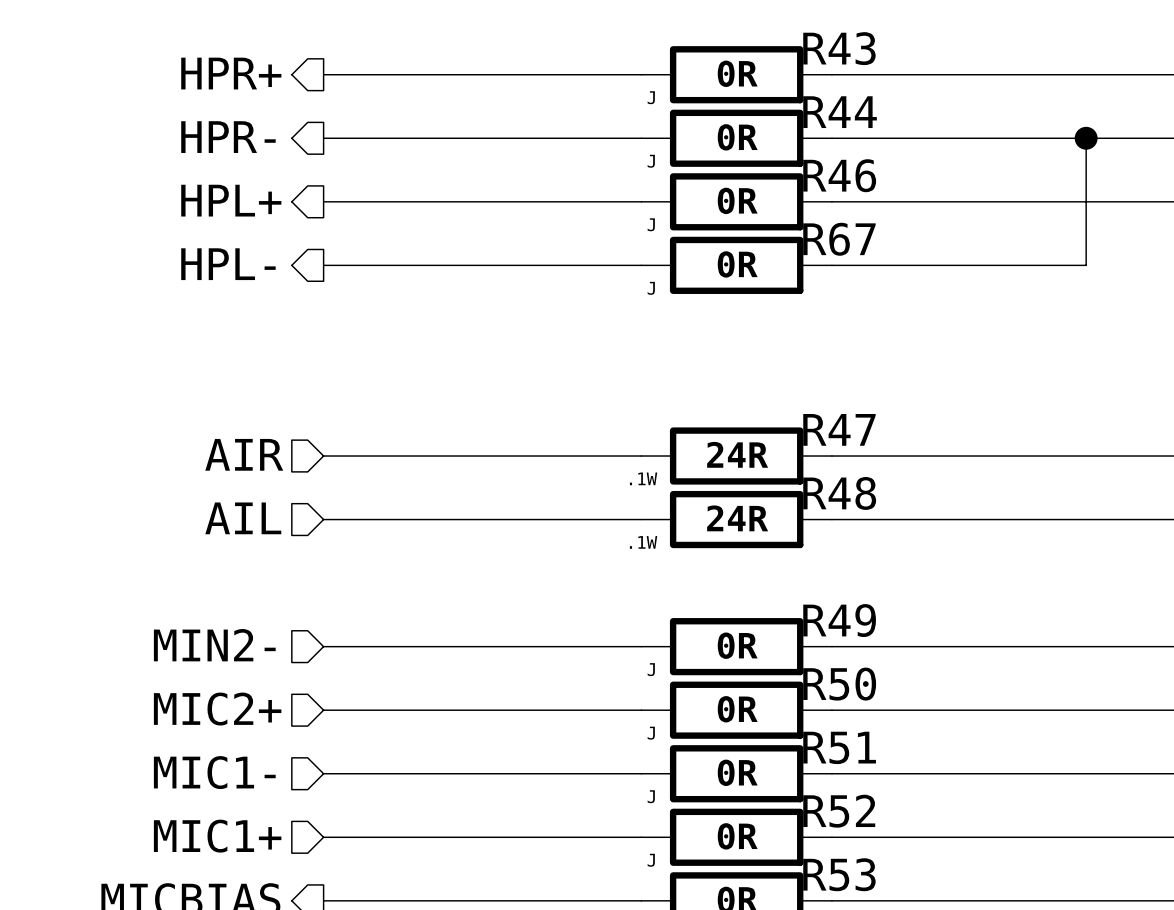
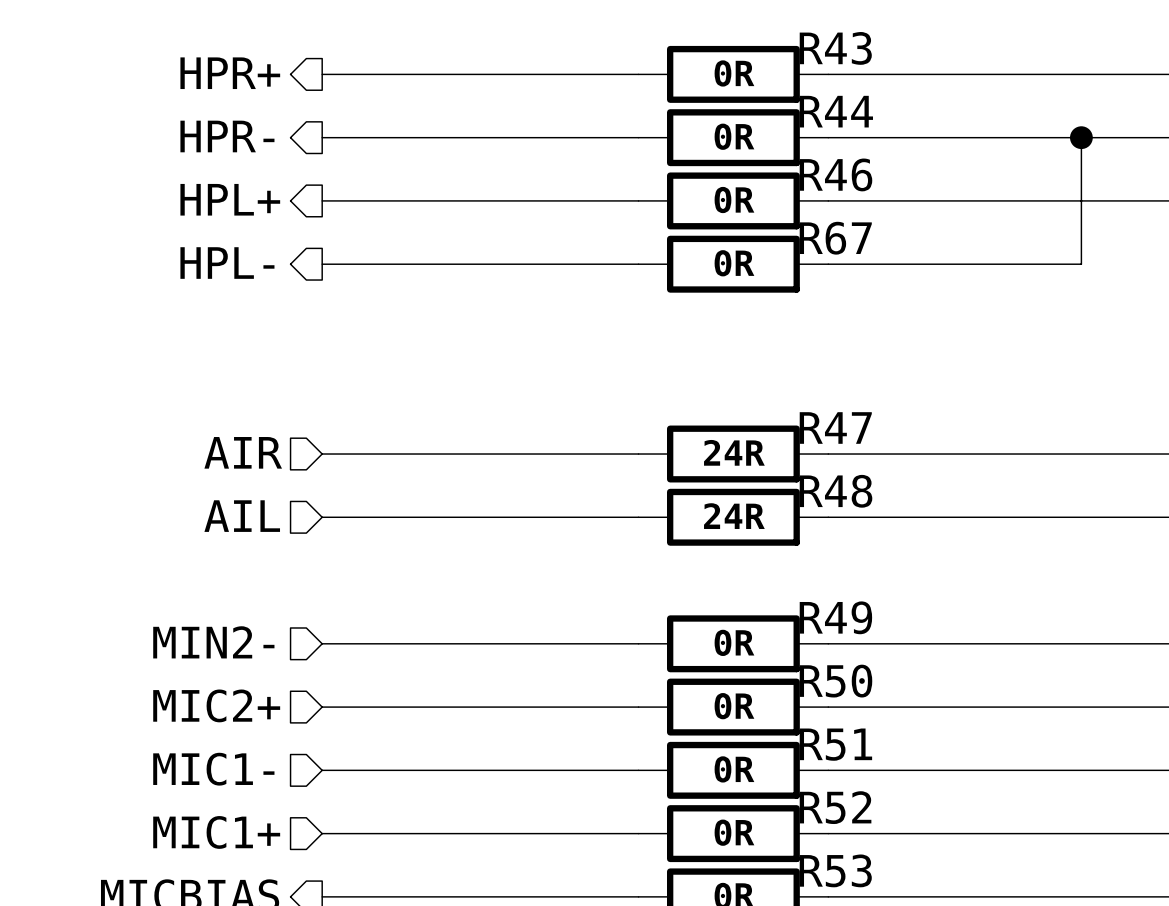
R43 text: J (651, 97) -> none
R44 text: J (651, 161) -> none
R46 text: J (651, 224) -> none
R67 text: J (651, 288) -> none
R47 text: .1W (643, 478) -> none
R48 text: .1W (643, 542) -> none
R49 text: J (651, 669) -> none
R50 text: J (651, 733) -> none
R51 text: J (651, 796) -> none
R52 text: J (651, 860) -> none

